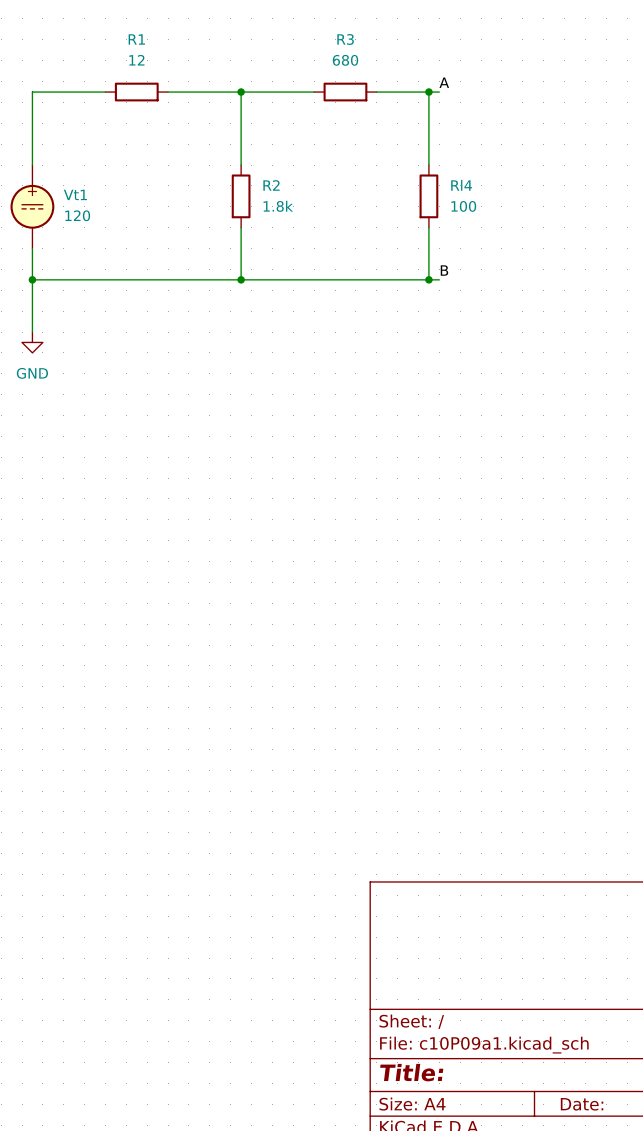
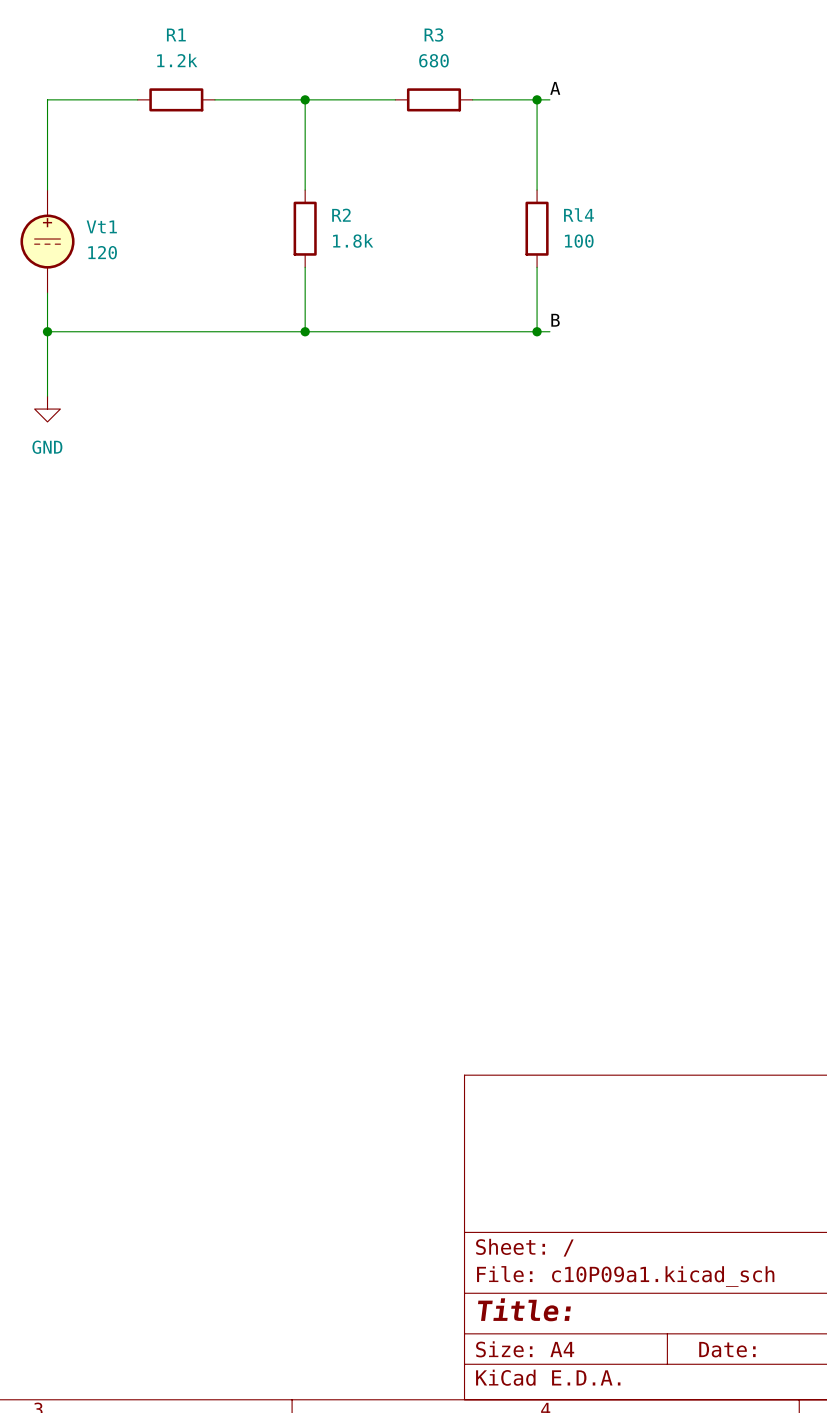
R1 value: 12 (136, 60) -> 1.2k (177, 60)

